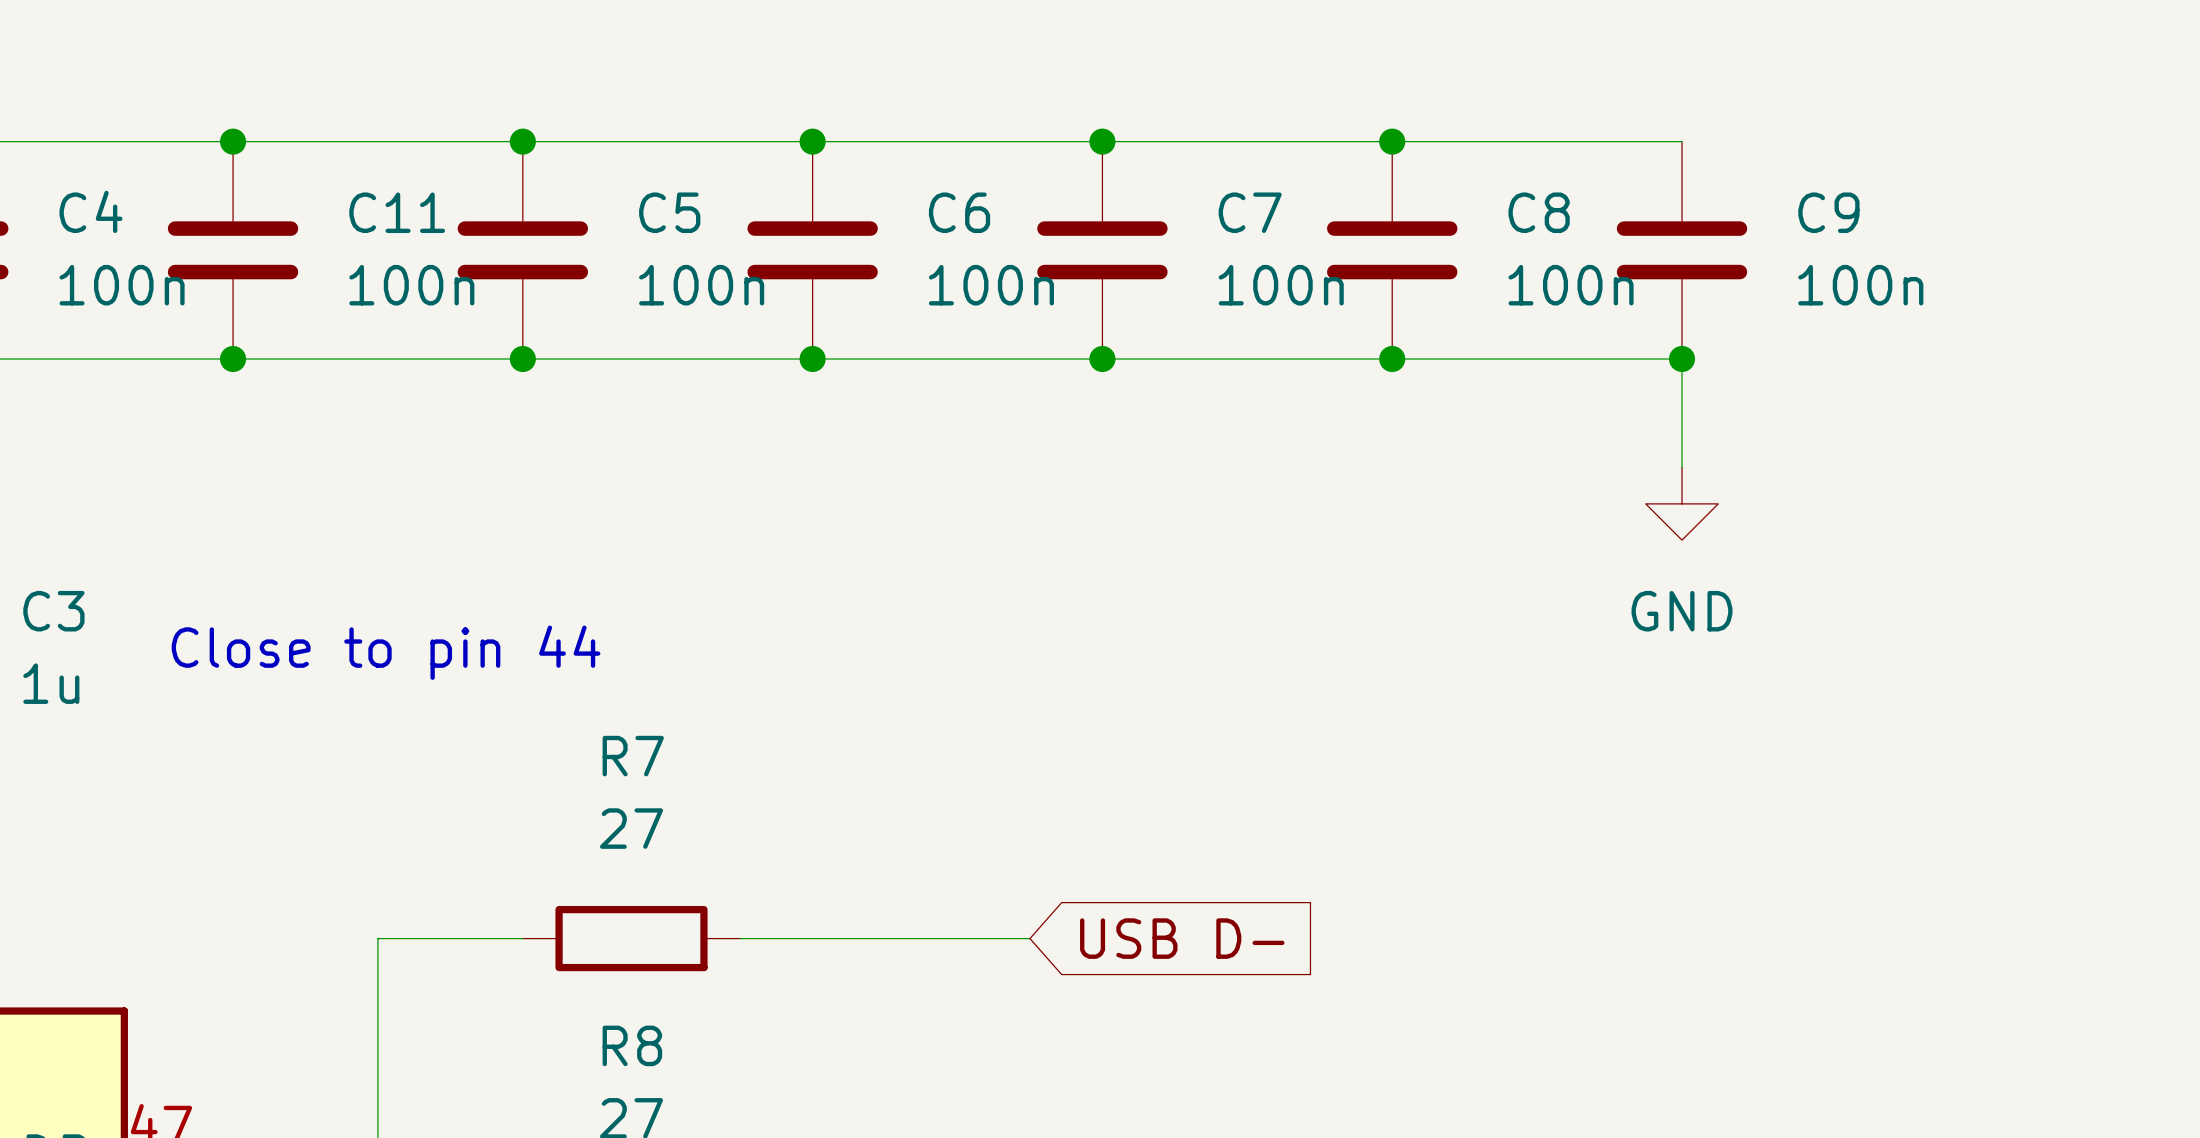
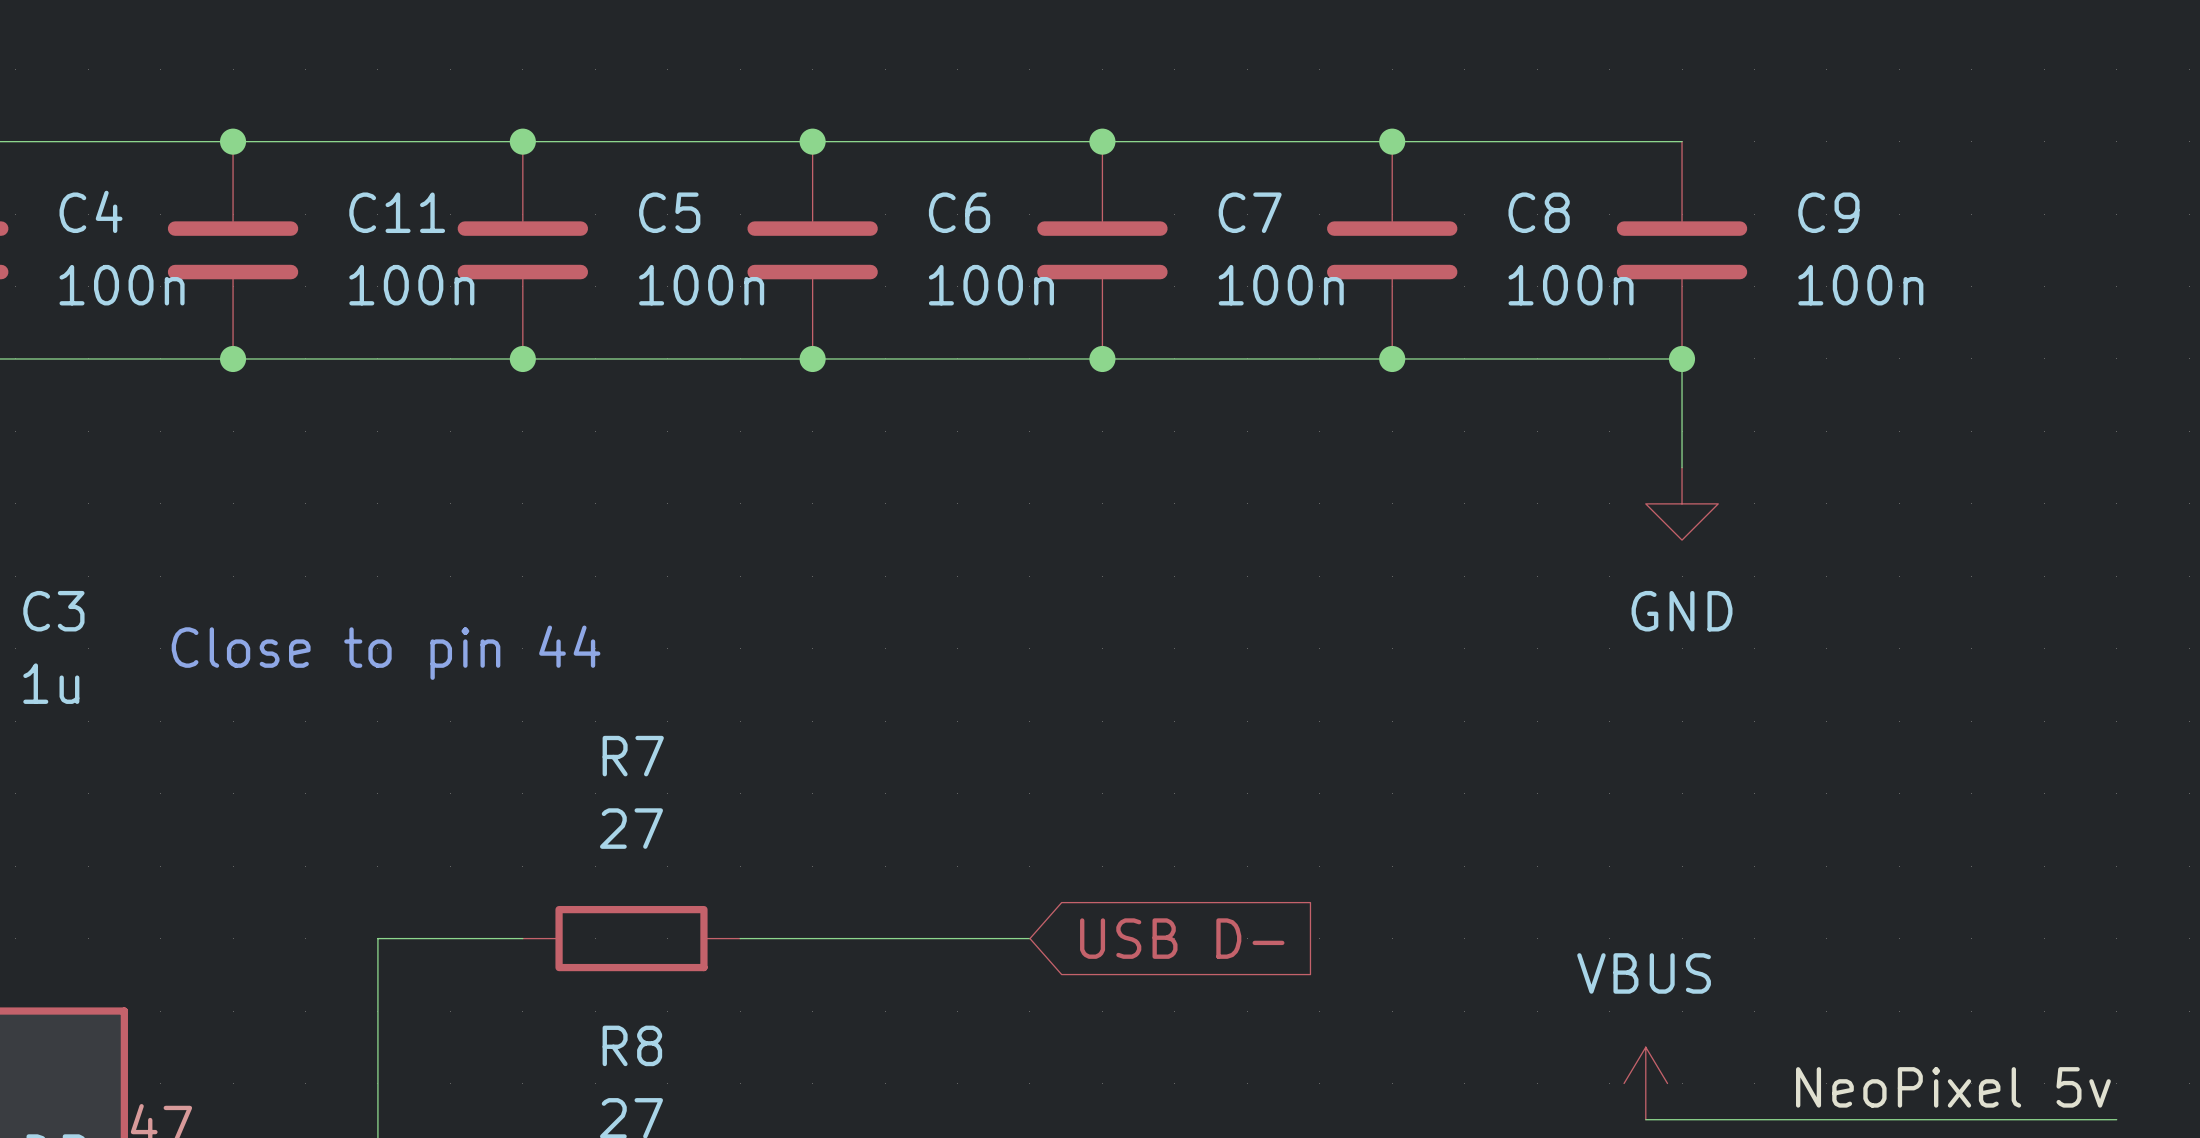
power symbol: none -> VBUS (1645, 1083)
label: none -> NeoPixel 5v (1953, 1087)
wire: none -> (1645, 1119) (2116, 1119)

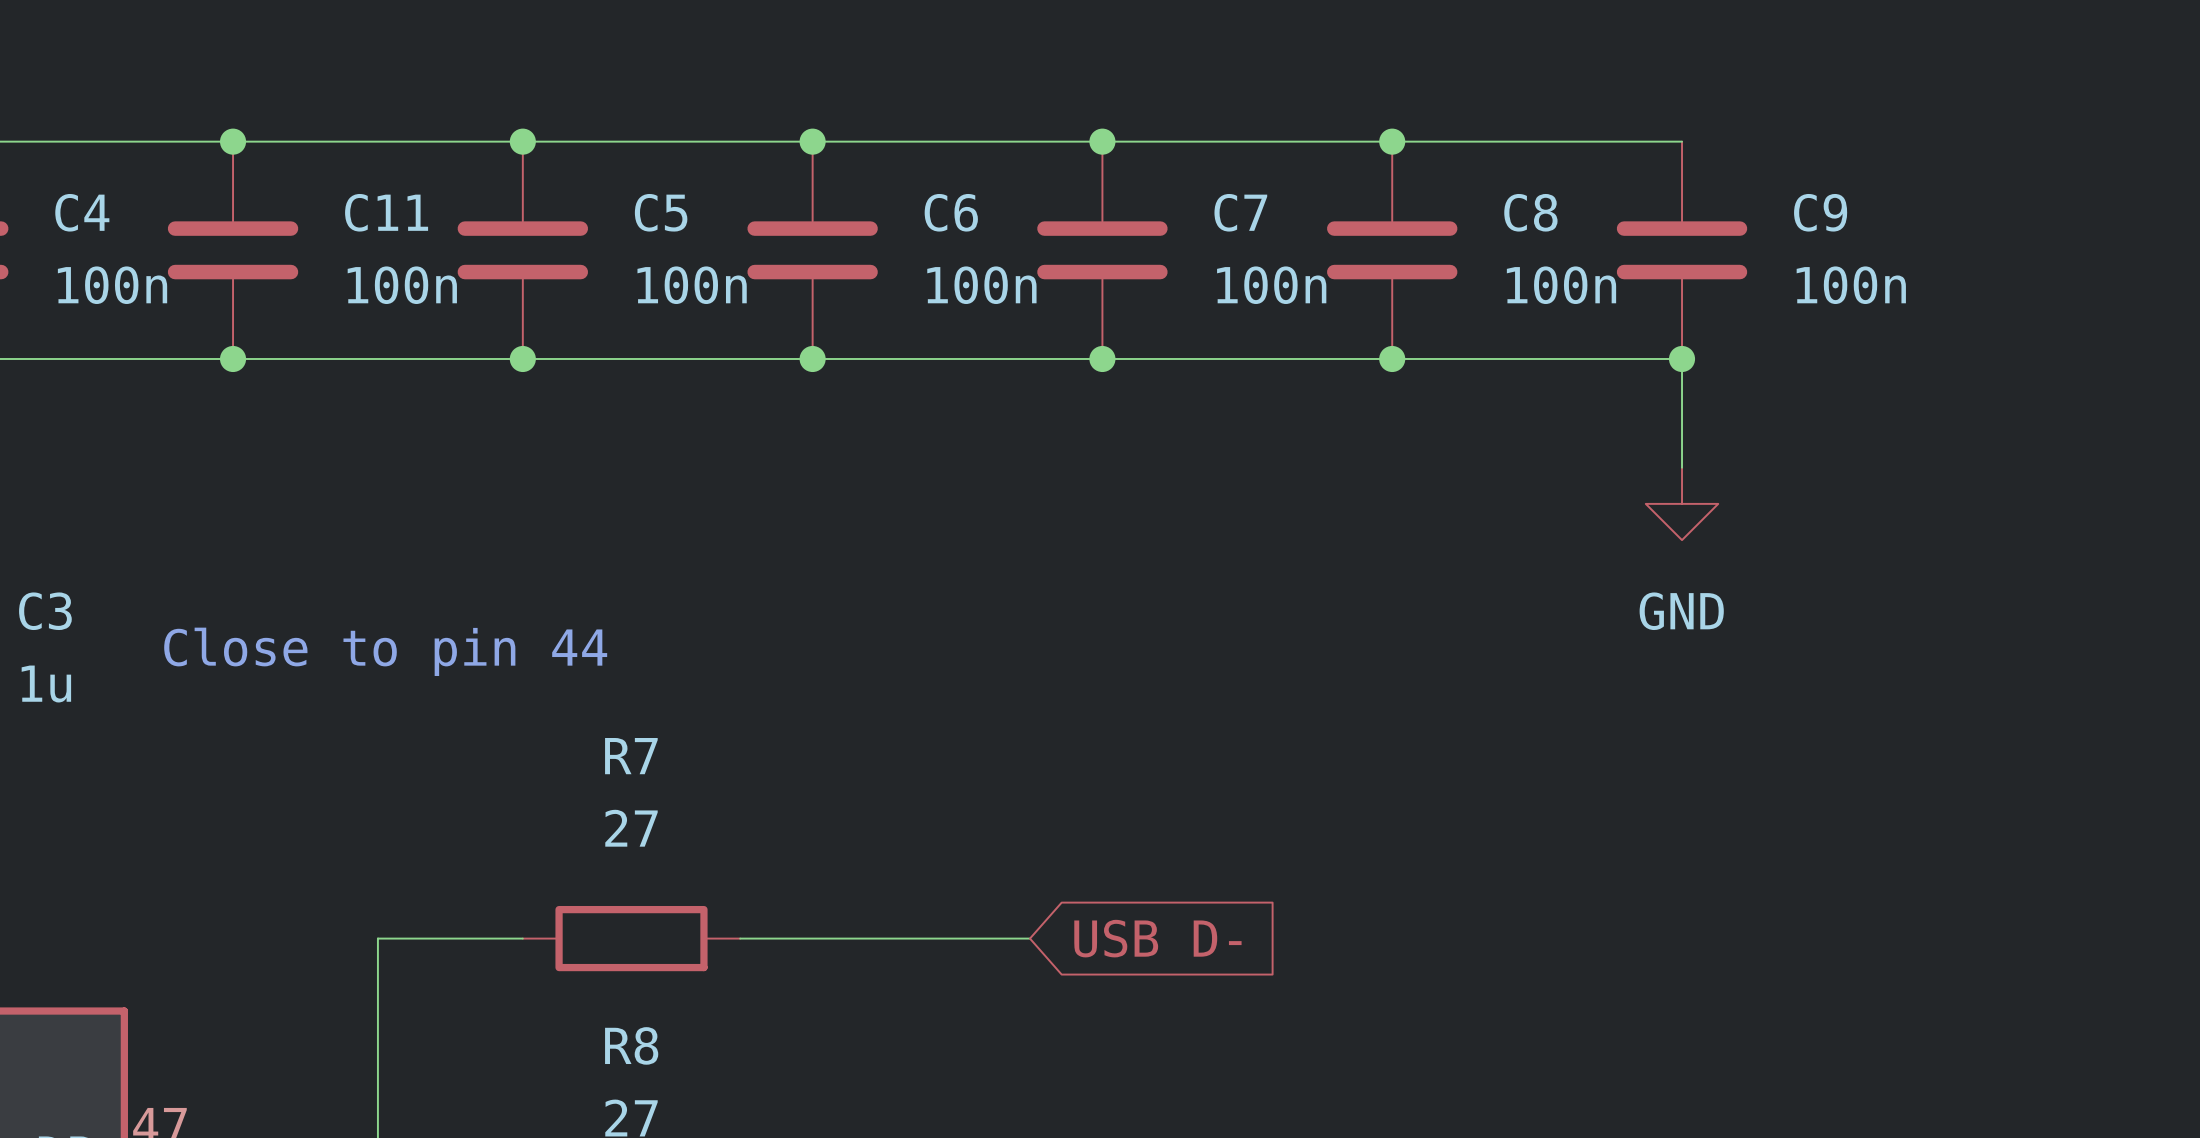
power symbol: VBUS (1645, 1083) -> none
label: NeoPixel 5v (1953, 1087) -> none
wire: (1645, 1119) (2116, 1119) -> none

